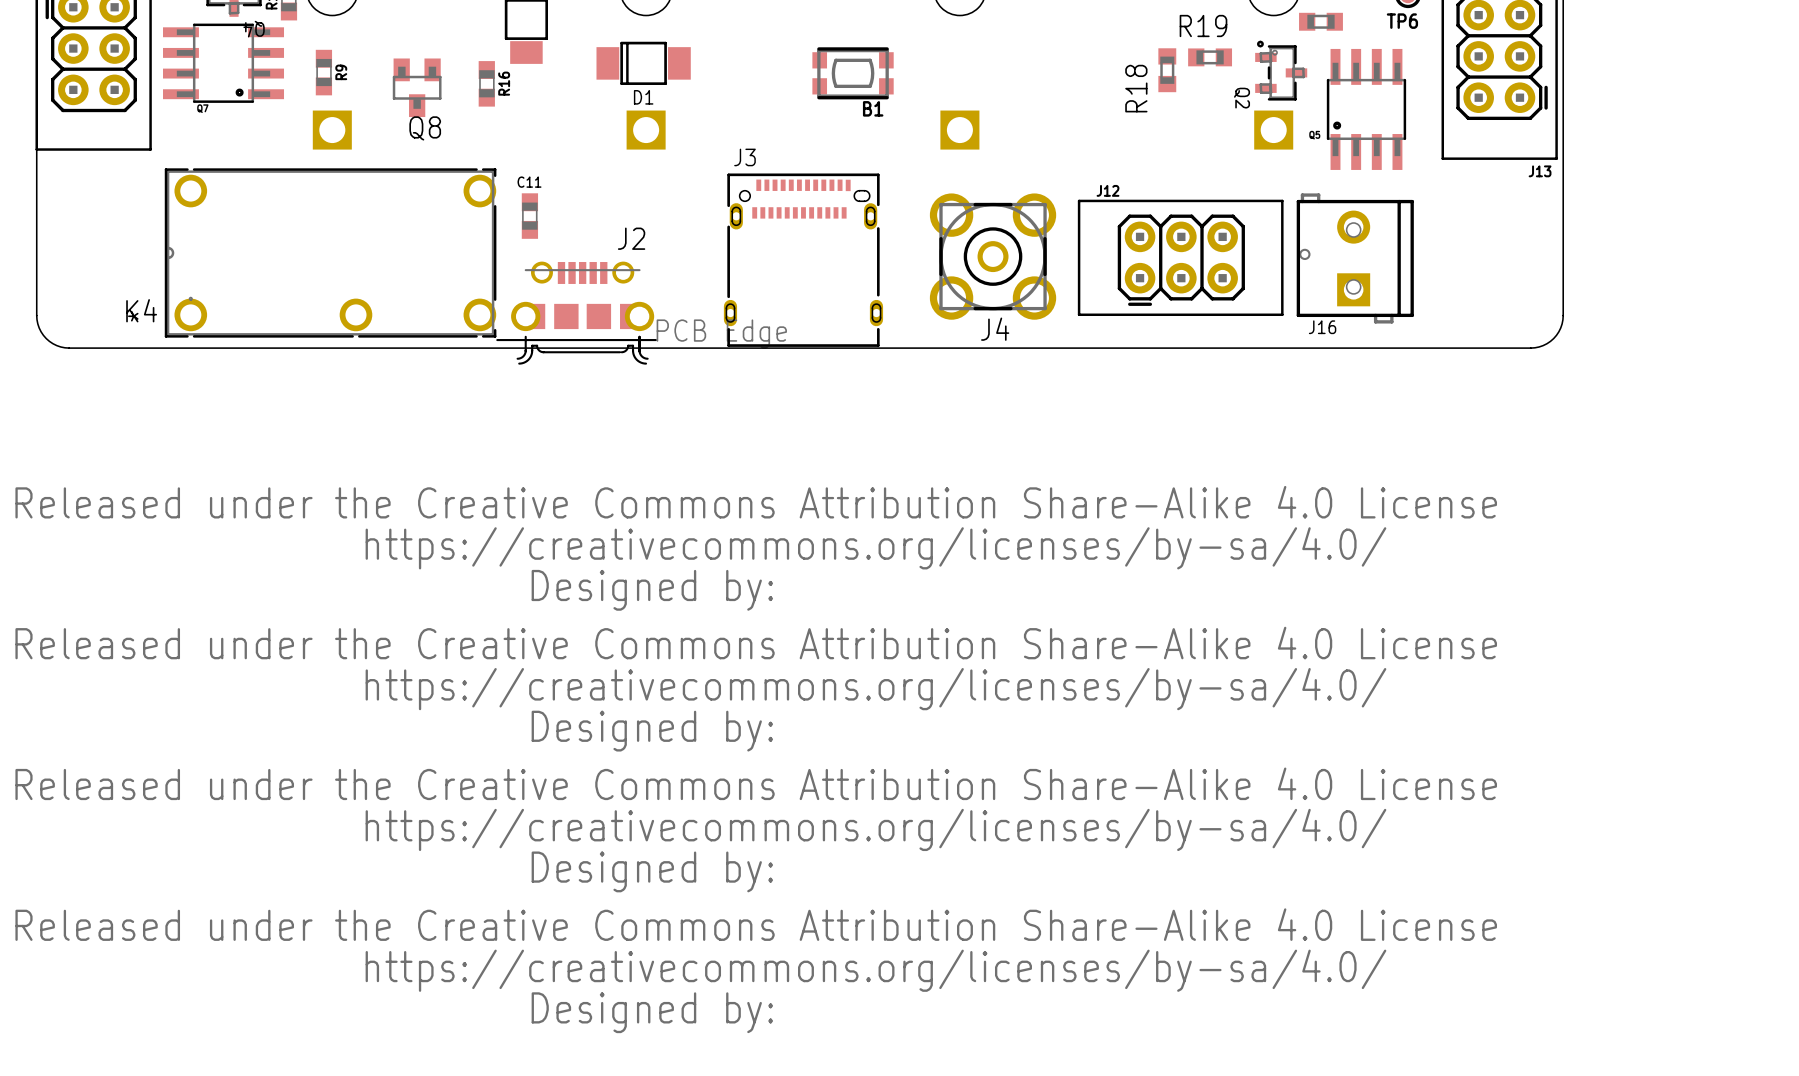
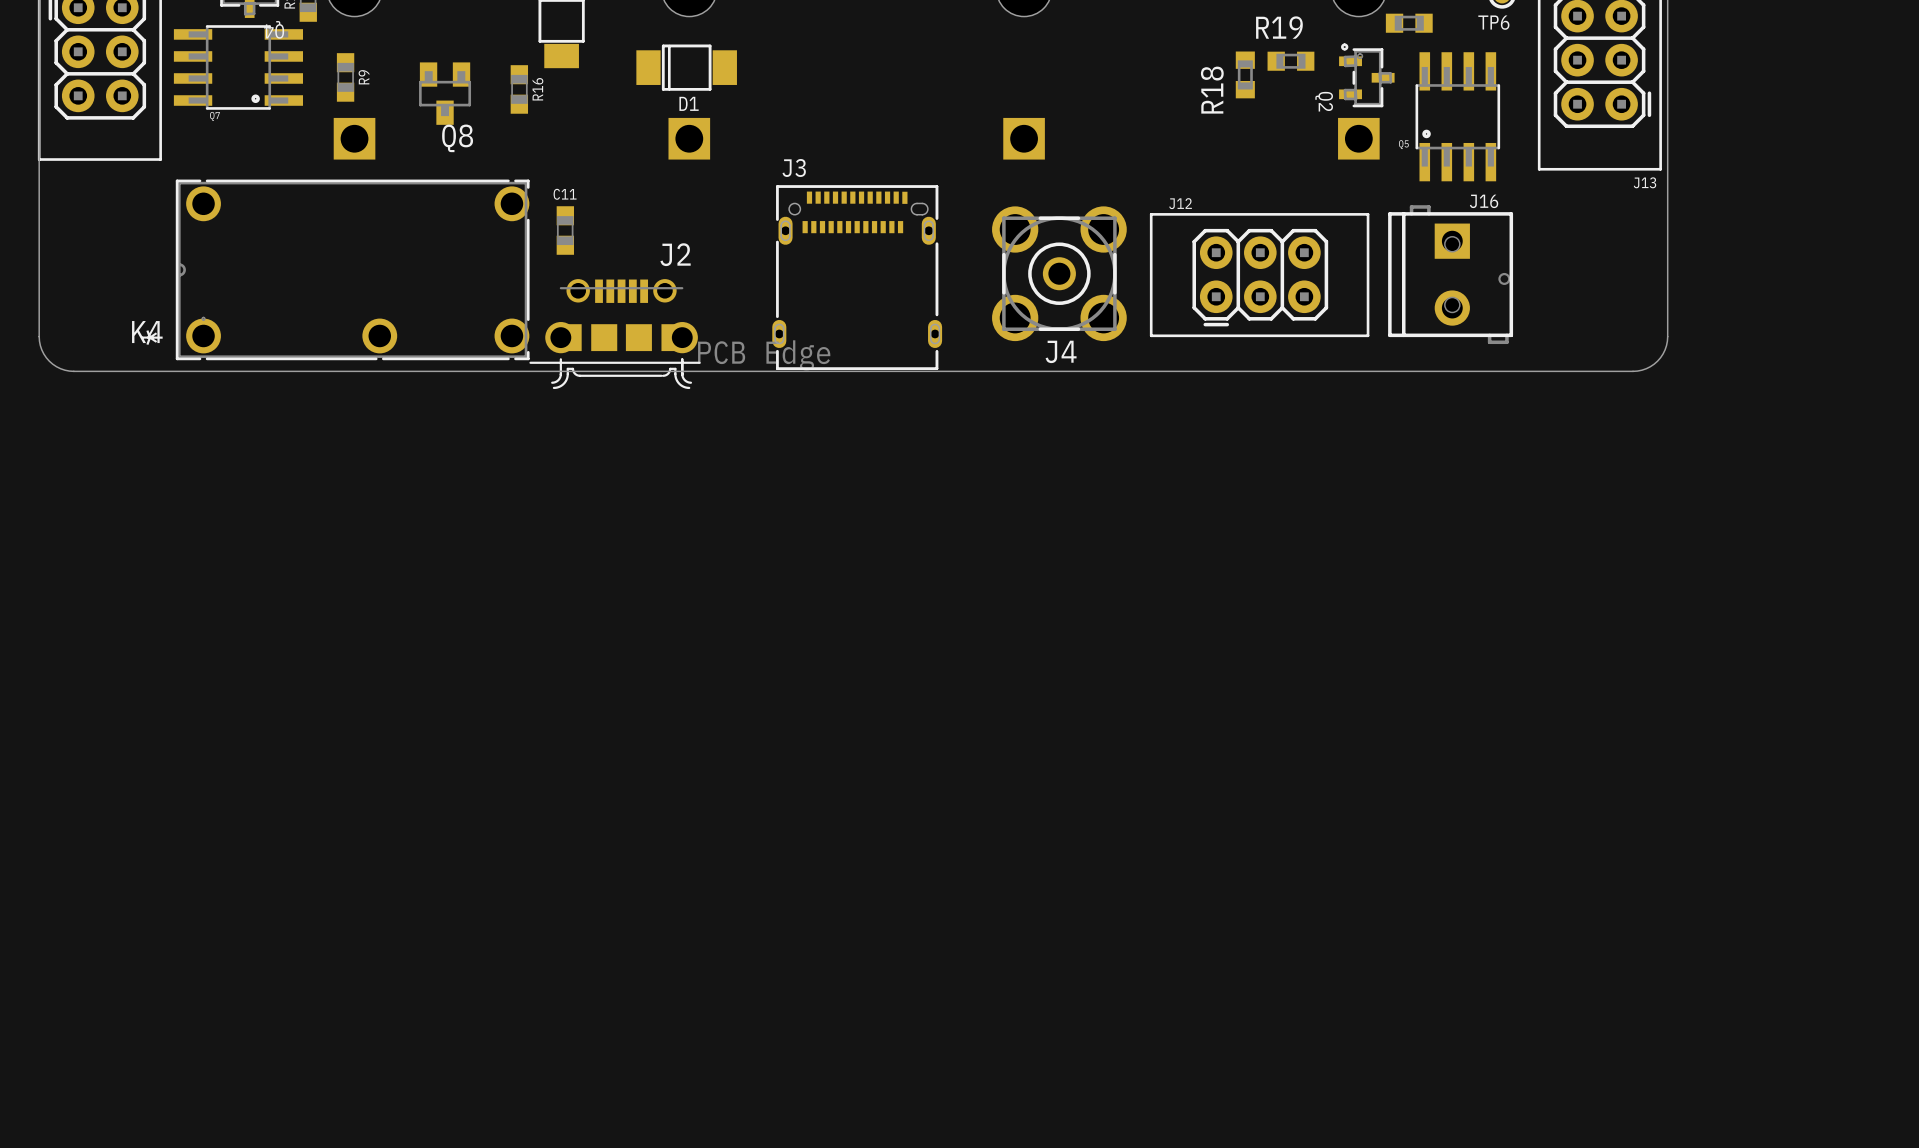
B1: (853, 73) -> none
J16 rotation: 0° (1355, 258) -> 180° (1450, 274)
drawing: [15, 485, 1498, 1034] -> none

